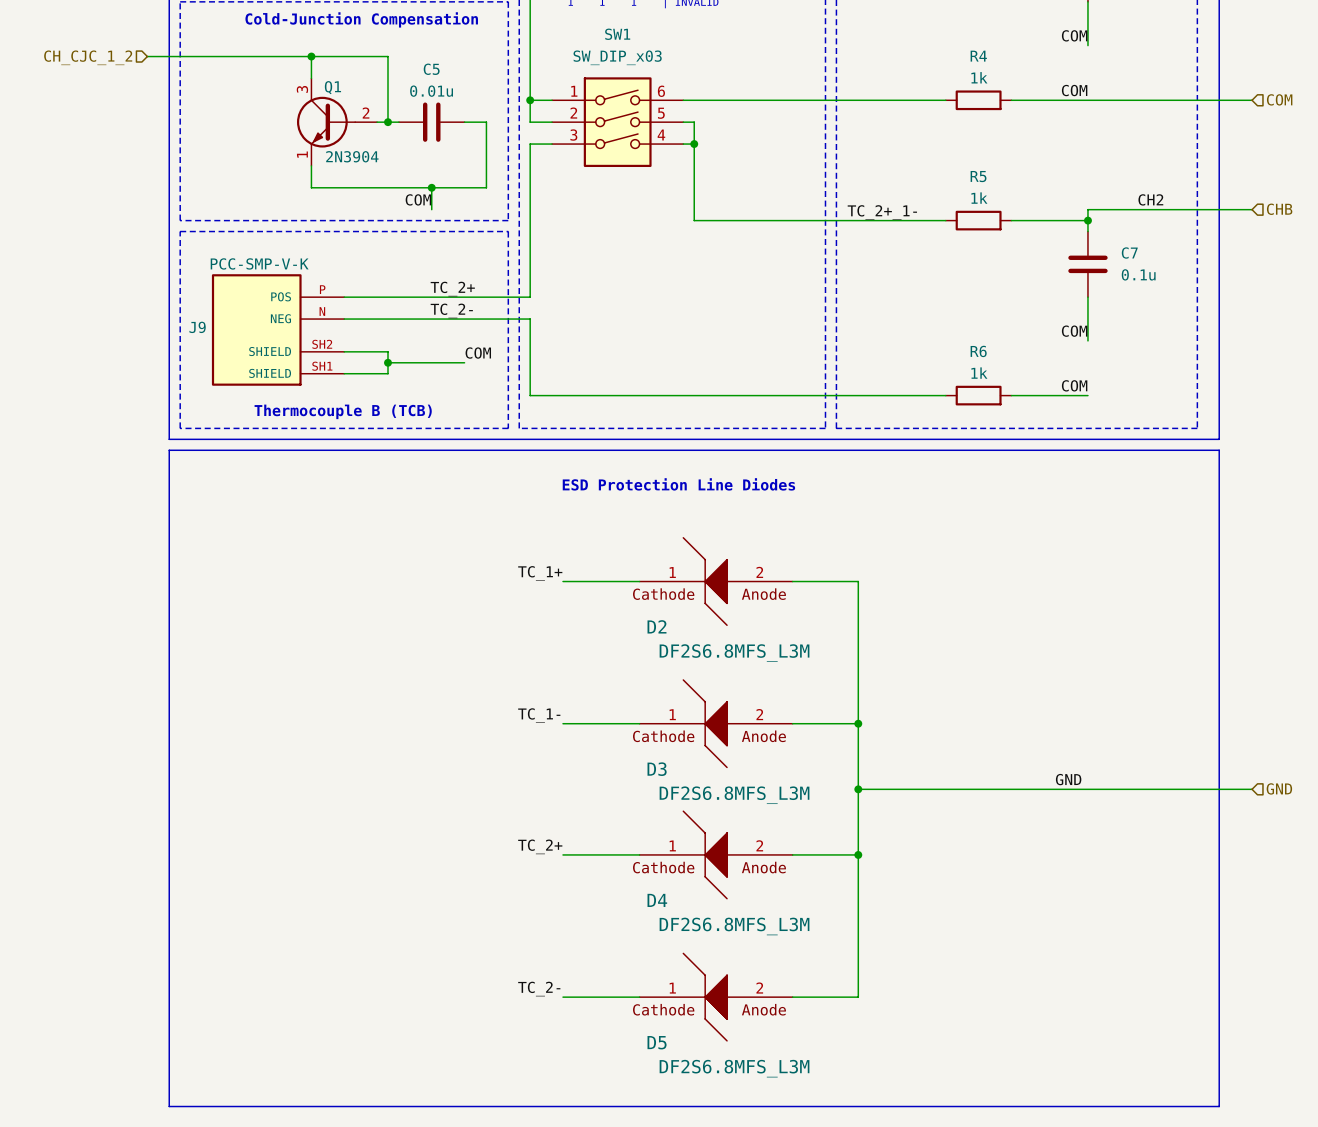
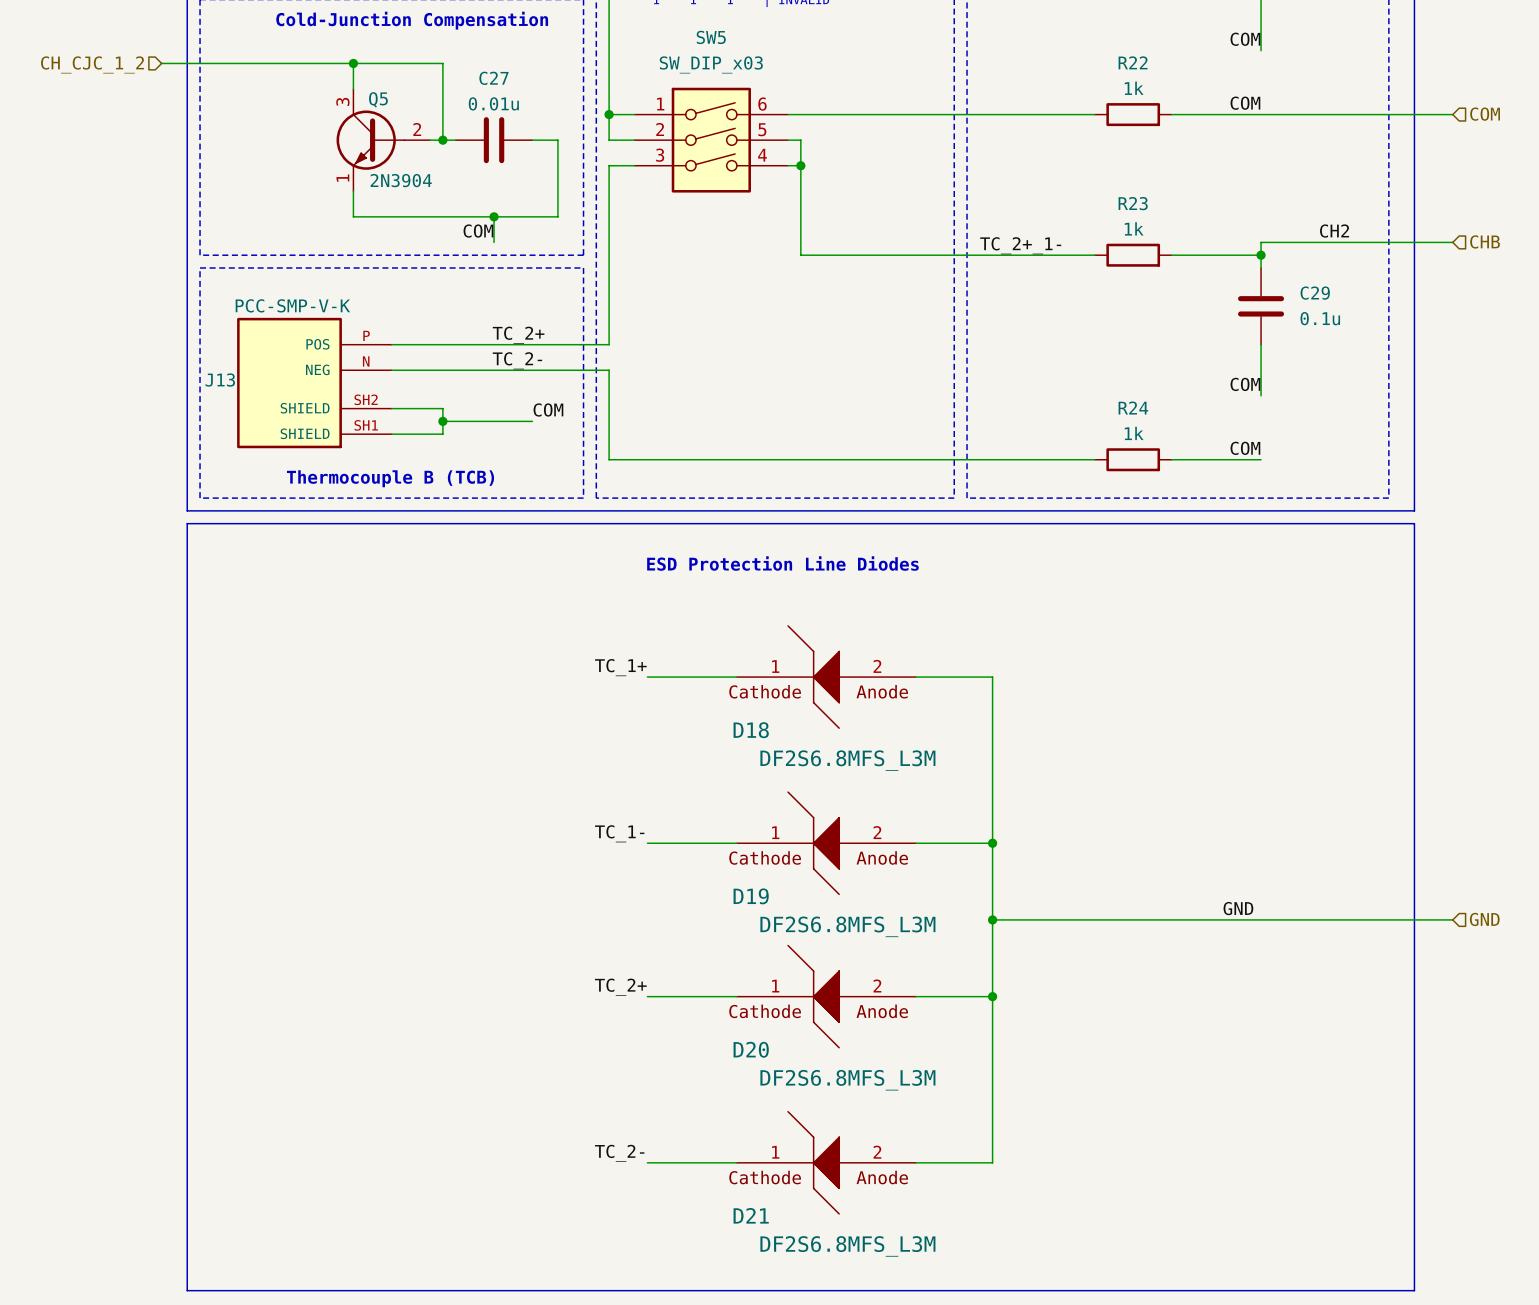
SW1 name: SW1 (617, 34) -> SW5 (711, 37)
R4 name: R4 (978, 56) -> R22 (1133, 62)
C5 name: C5 (431, 69) -> C27 (493, 78)
Q1 name: Q1 (332, 87) -> Q5 (378, 99)
R5 name: R5 (978, 176) -> R23 (1133, 203)
C7 name: C7 (1129, 253) -> C29 (1315, 293)
J9 name: J9 (197, 327) -> J13 (220, 380)
R6 name: R6 (978, 351) -> R24 (1133, 408)
D2 name: D2 (656, 626) -> D18 (751, 730)
D3 name: D3 (657, 769) -> D19 (751, 896)
D4 name: D4 (657, 900) -> D20 (751, 1049)
D5 name: D5 (657, 1042) -> D21 (751, 1215)

